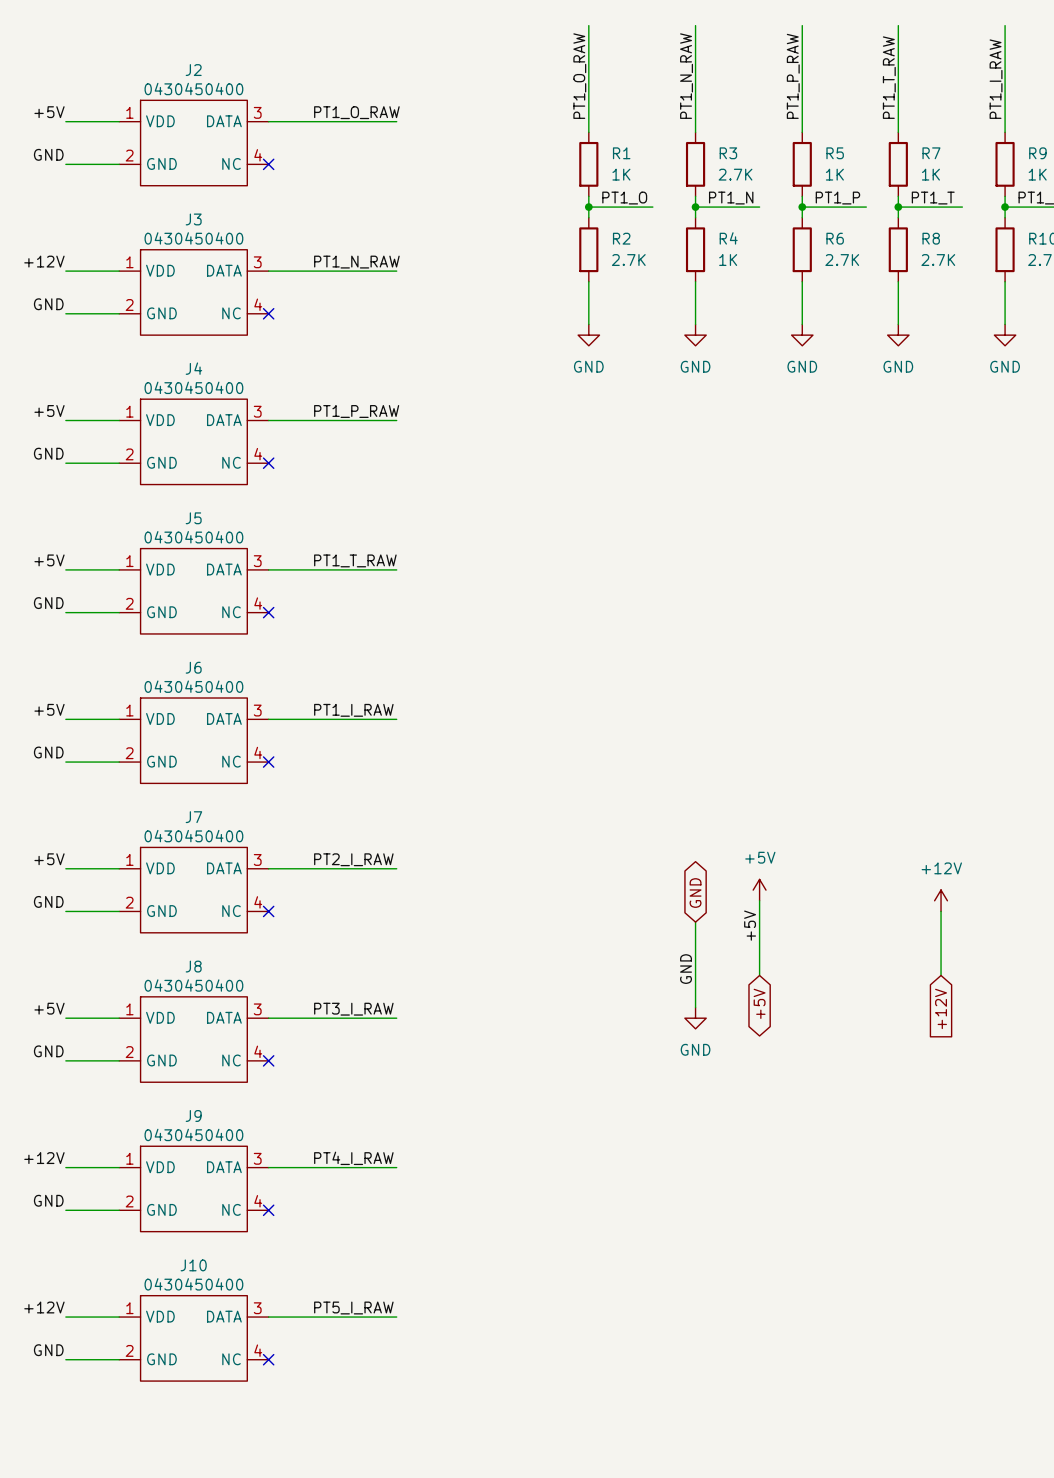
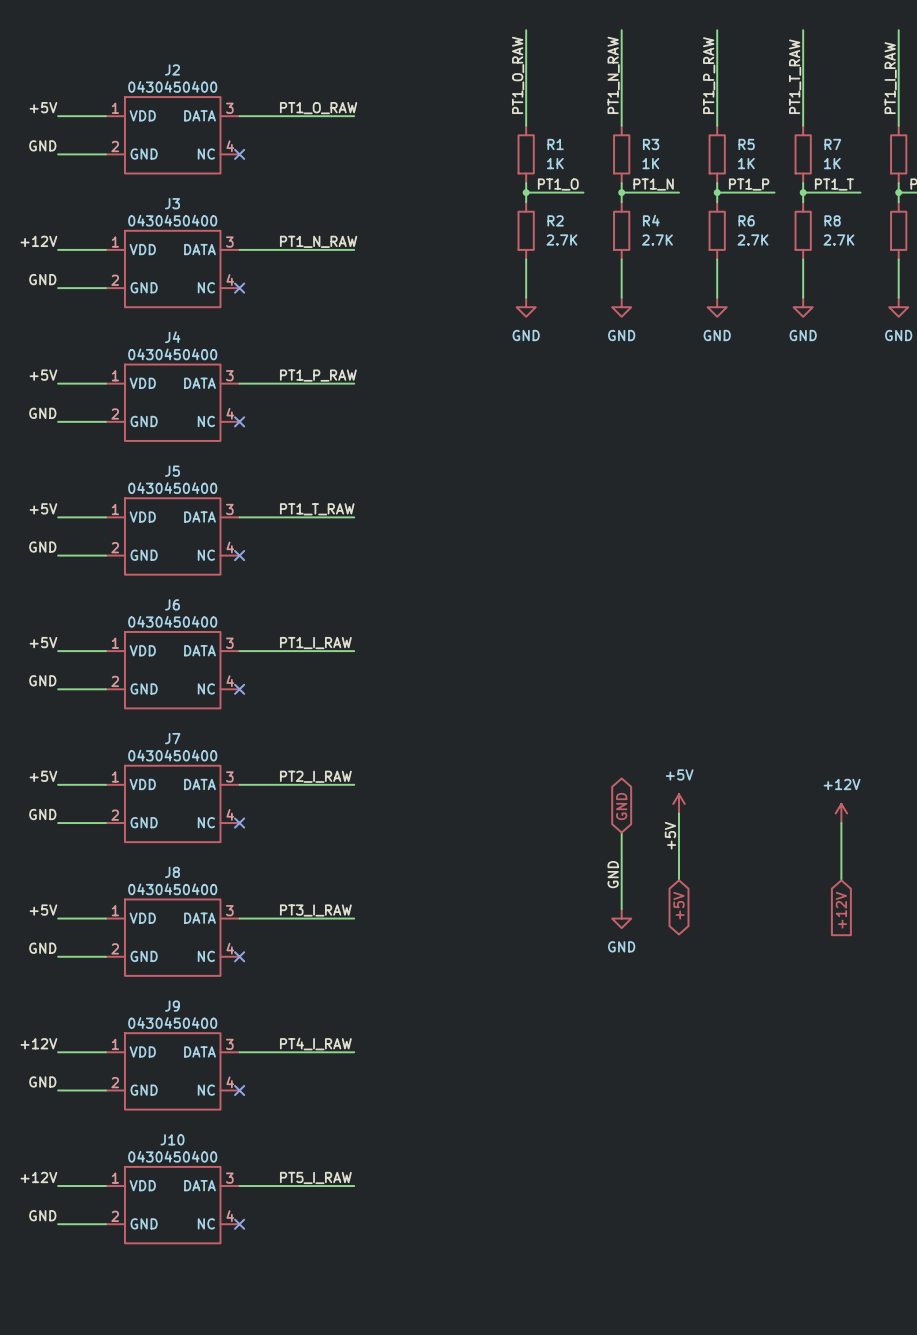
R3 value: 2.7K (735, 174) -> 1K (650, 163)
R4 value: 1K (728, 260) -> 2.7K (657, 240)

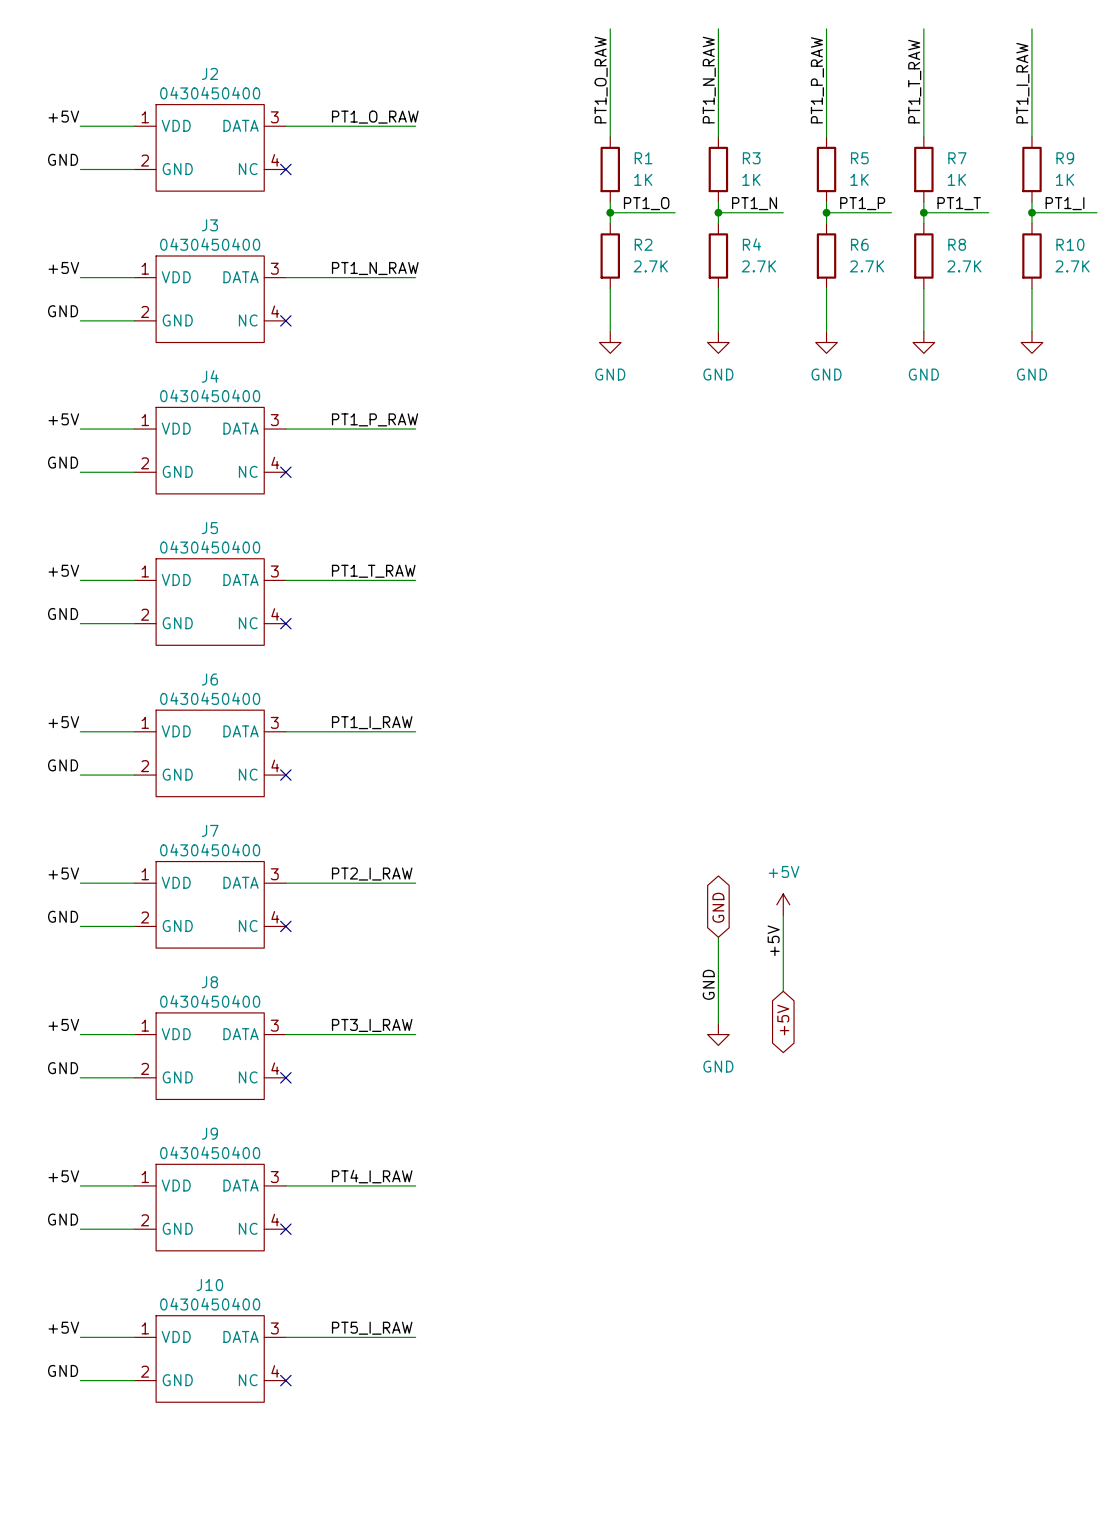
label: +12V (38, 241) -> +5V (63, 267)
power symbol: +12V (841, 813) -> none
wire: (841, 823) (841, 880) -> none
global label: +12V (841, 910) -> none
label: +12V (38, 1043) -> +5V (63, 1176)
label: +12V (38, 1177) -> +5V (63, 1327)

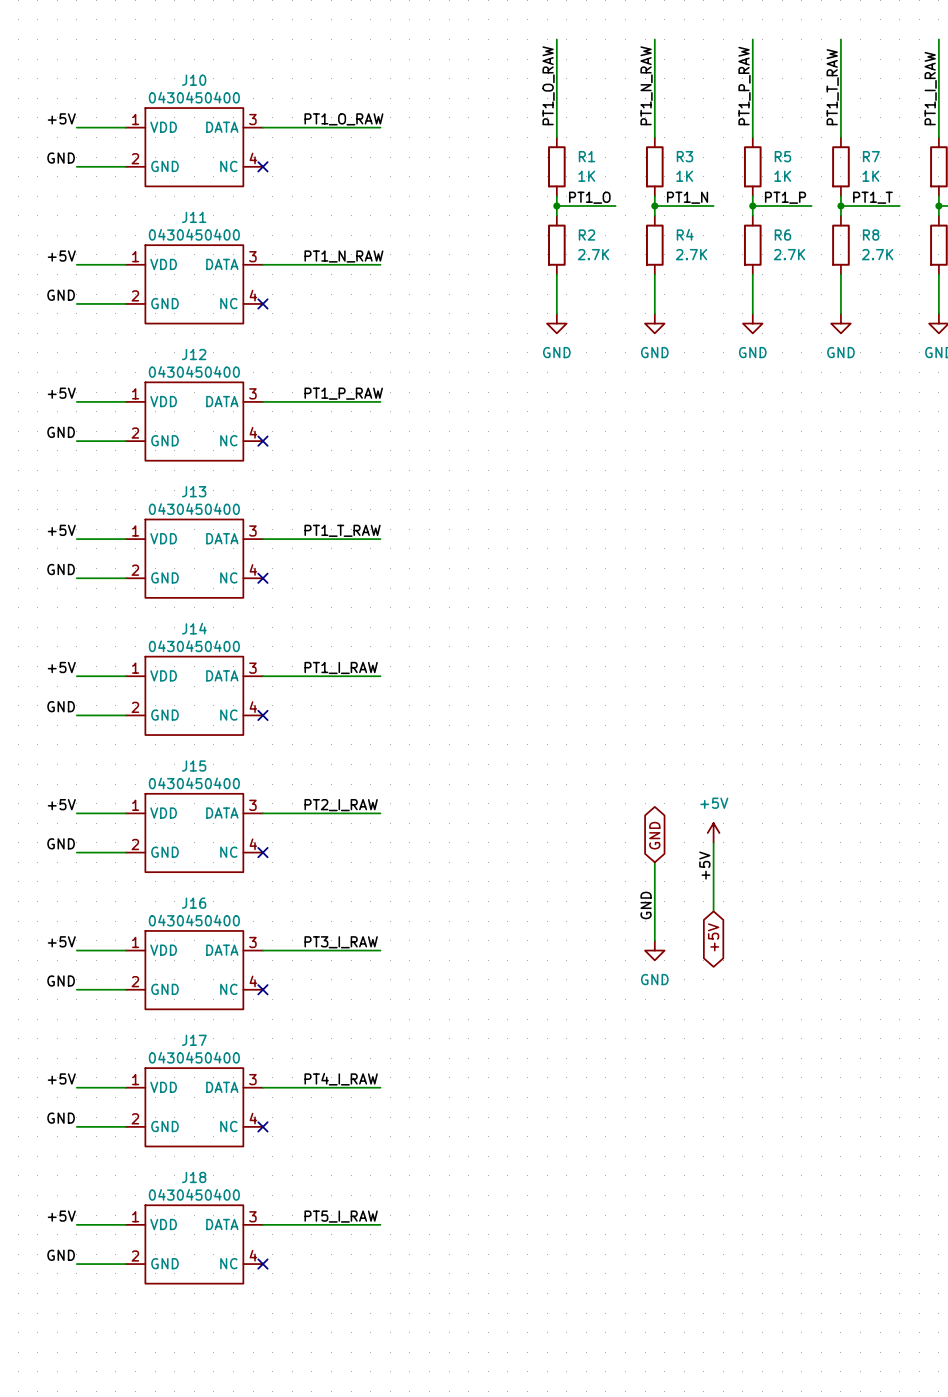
J2 name: J2 (209, 73) -> J10 (194, 80)
J3 name: J3 (209, 225) -> J11 (194, 217)
J4 name: J4 (210, 376) -> J12 (194, 354)
J5 name: J5 (209, 528) -> J13 (194, 491)
J6 name: J6 (209, 679) -> J14 (194, 628)
J7 name: J7 (210, 830) -> J15 (194, 766)
J8 name: J8 (209, 982) -> J16 (194, 903)
J9 name: J9 (209, 1133) -> J17 (194, 1040)
J10 name: J10 (209, 1285) -> J18 (194, 1177)

